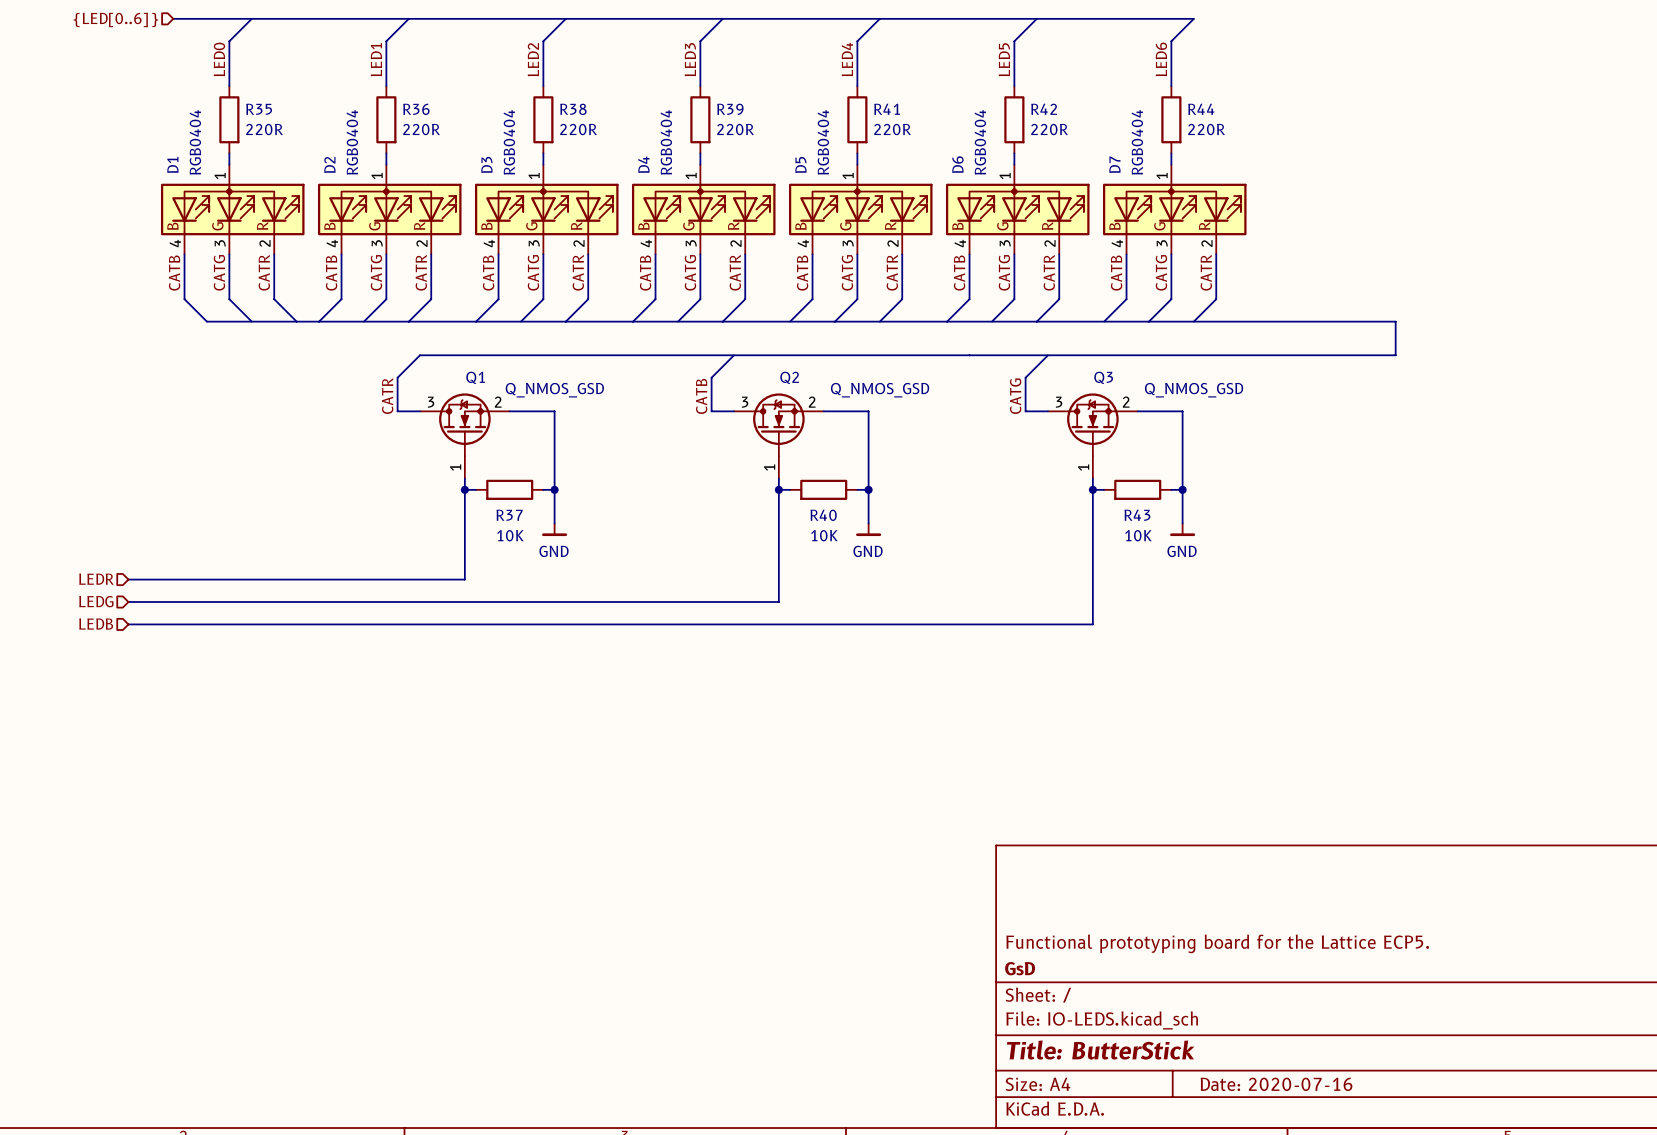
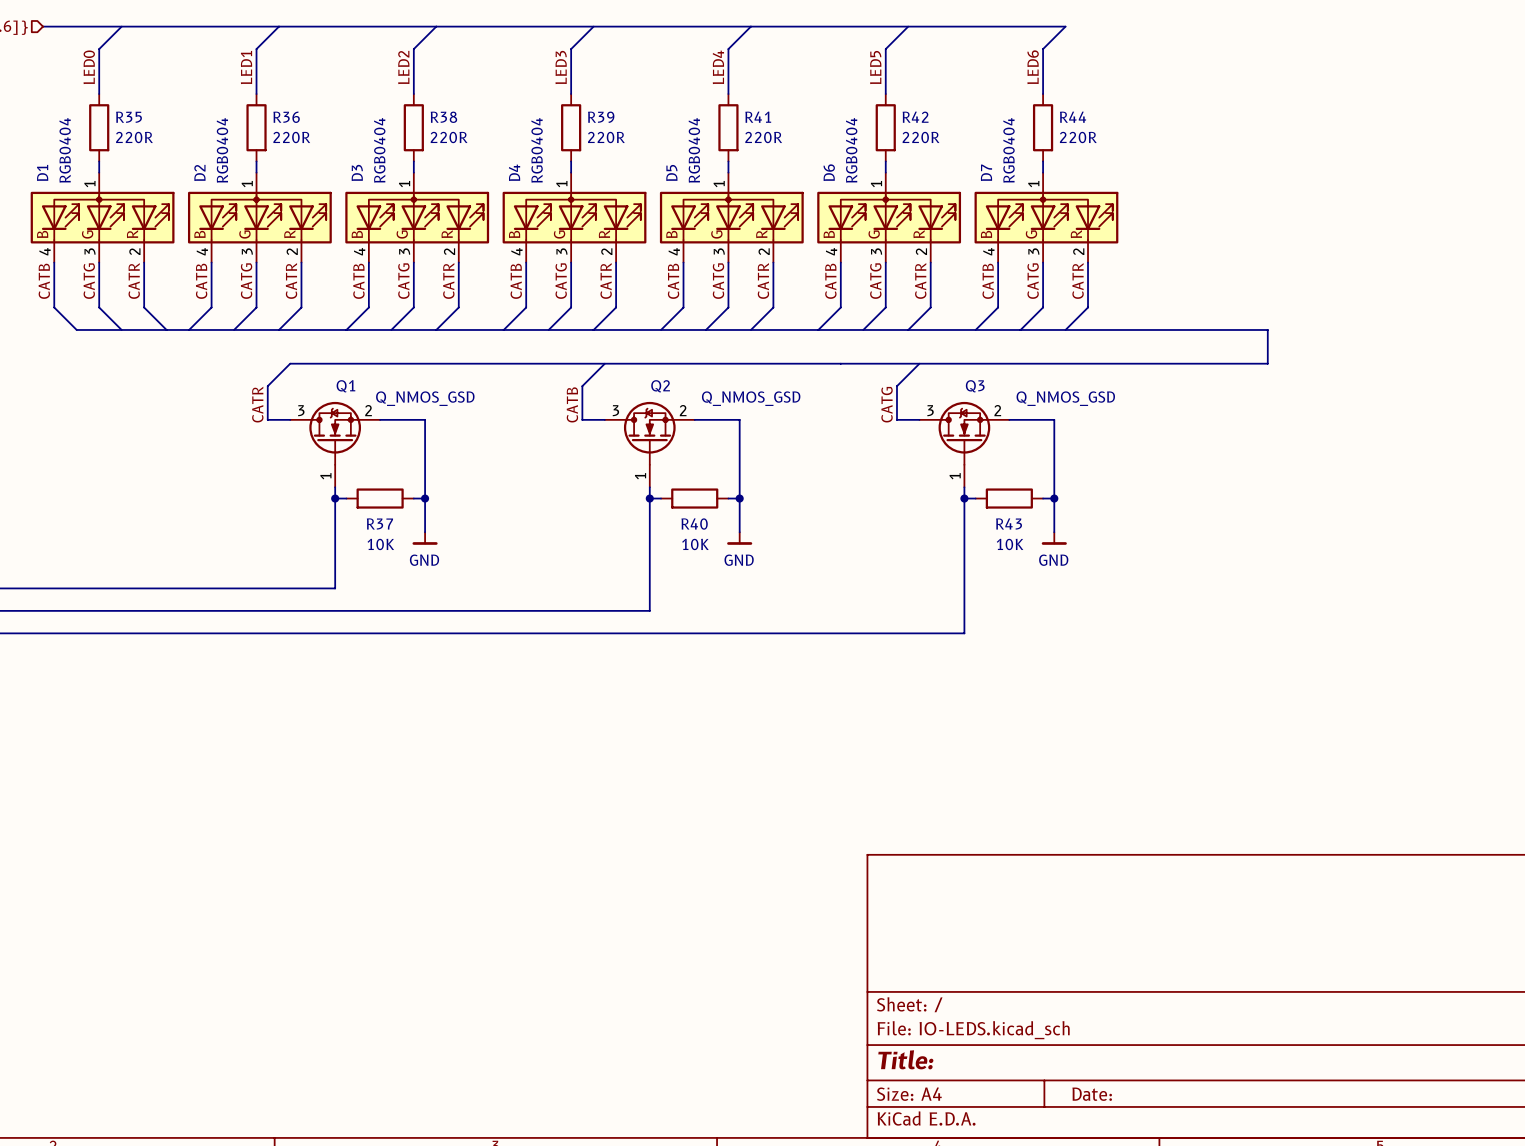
title block: Functional prototyping board for the Lattice ECP5. (1217, 943) -> none
title block: GsD (1020, 968) -> none
title block: Title: ButterStick (1100, 1050) -> Title: (905, 1059)
title block: Date: 2020-07-16 (1276, 1084) -> Date: (1092, 1094)

